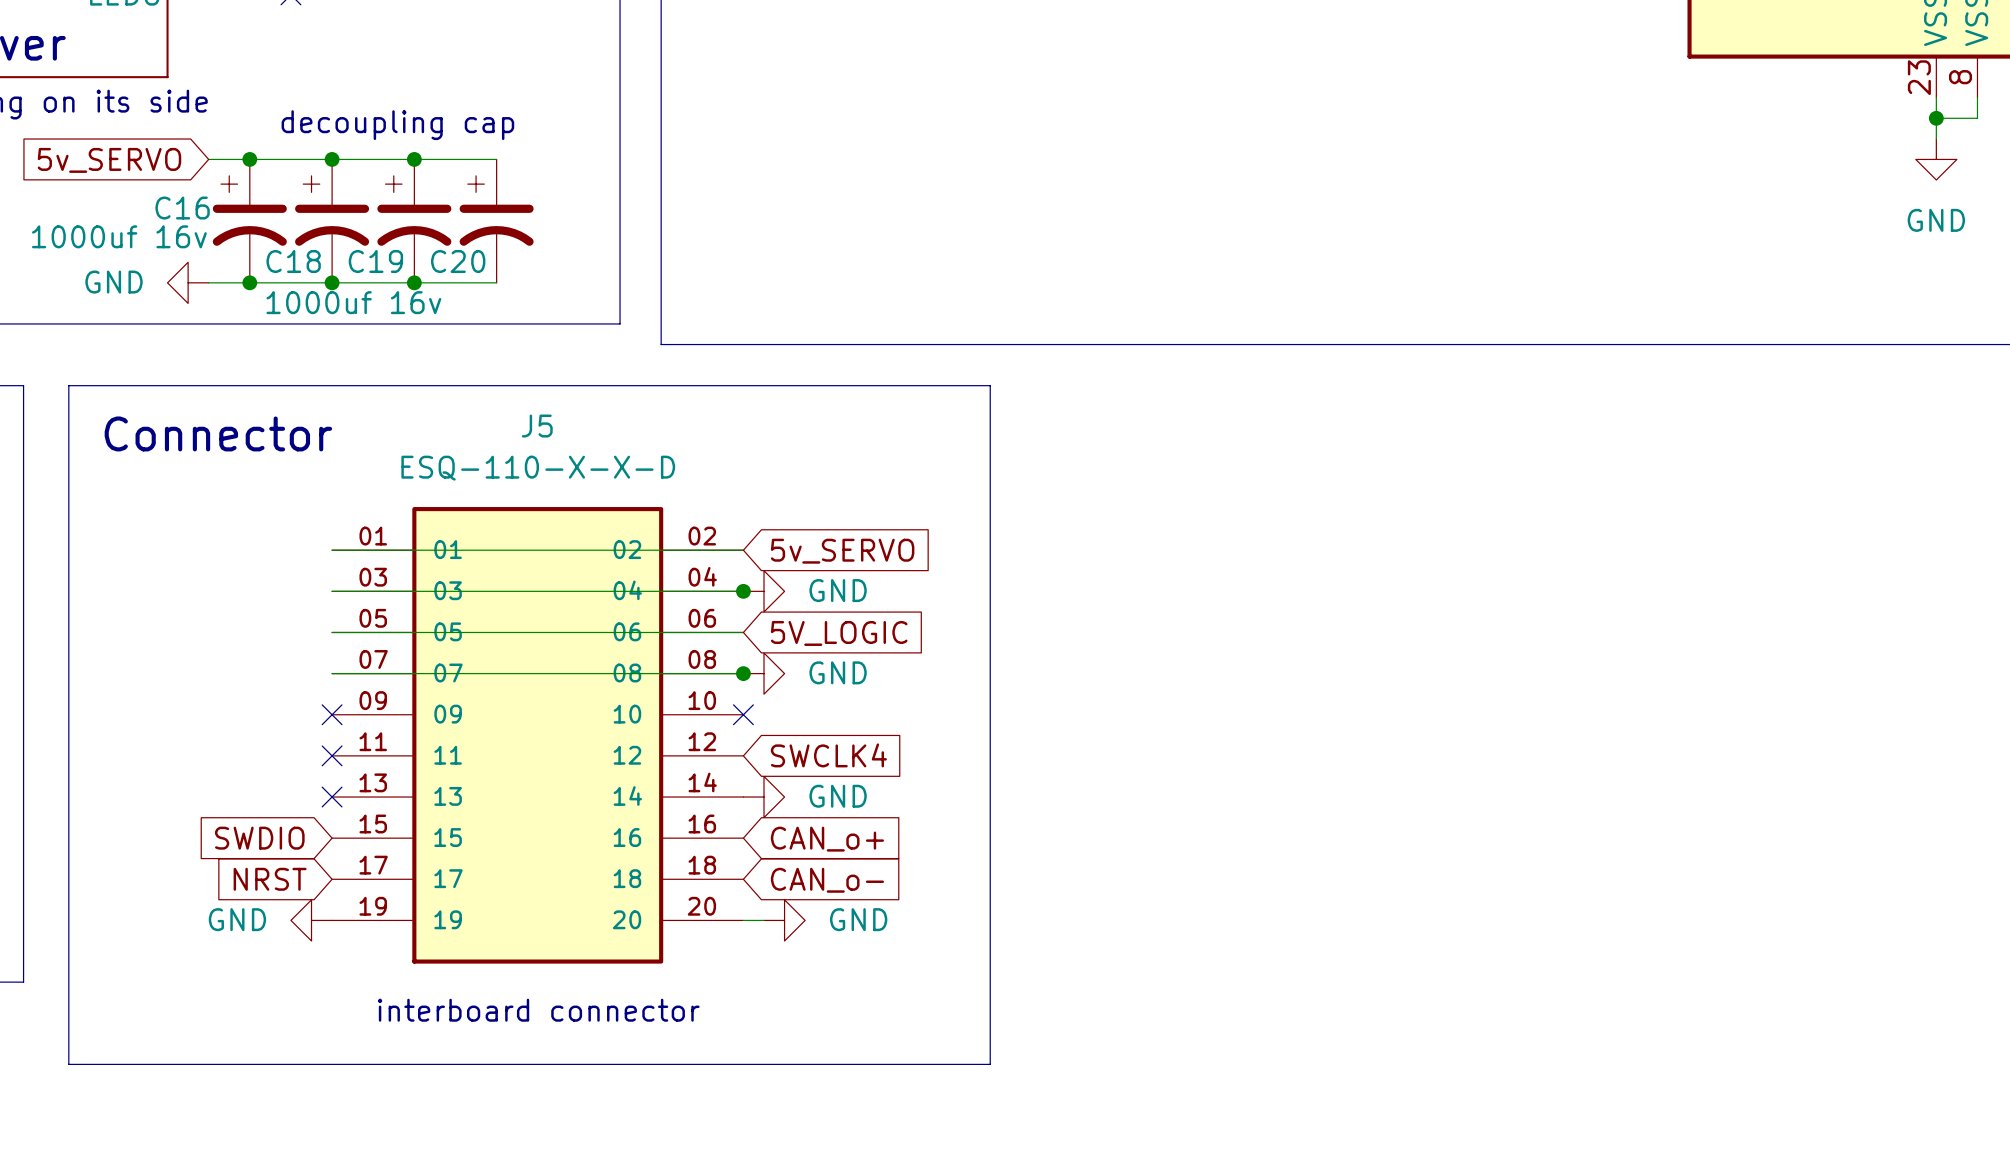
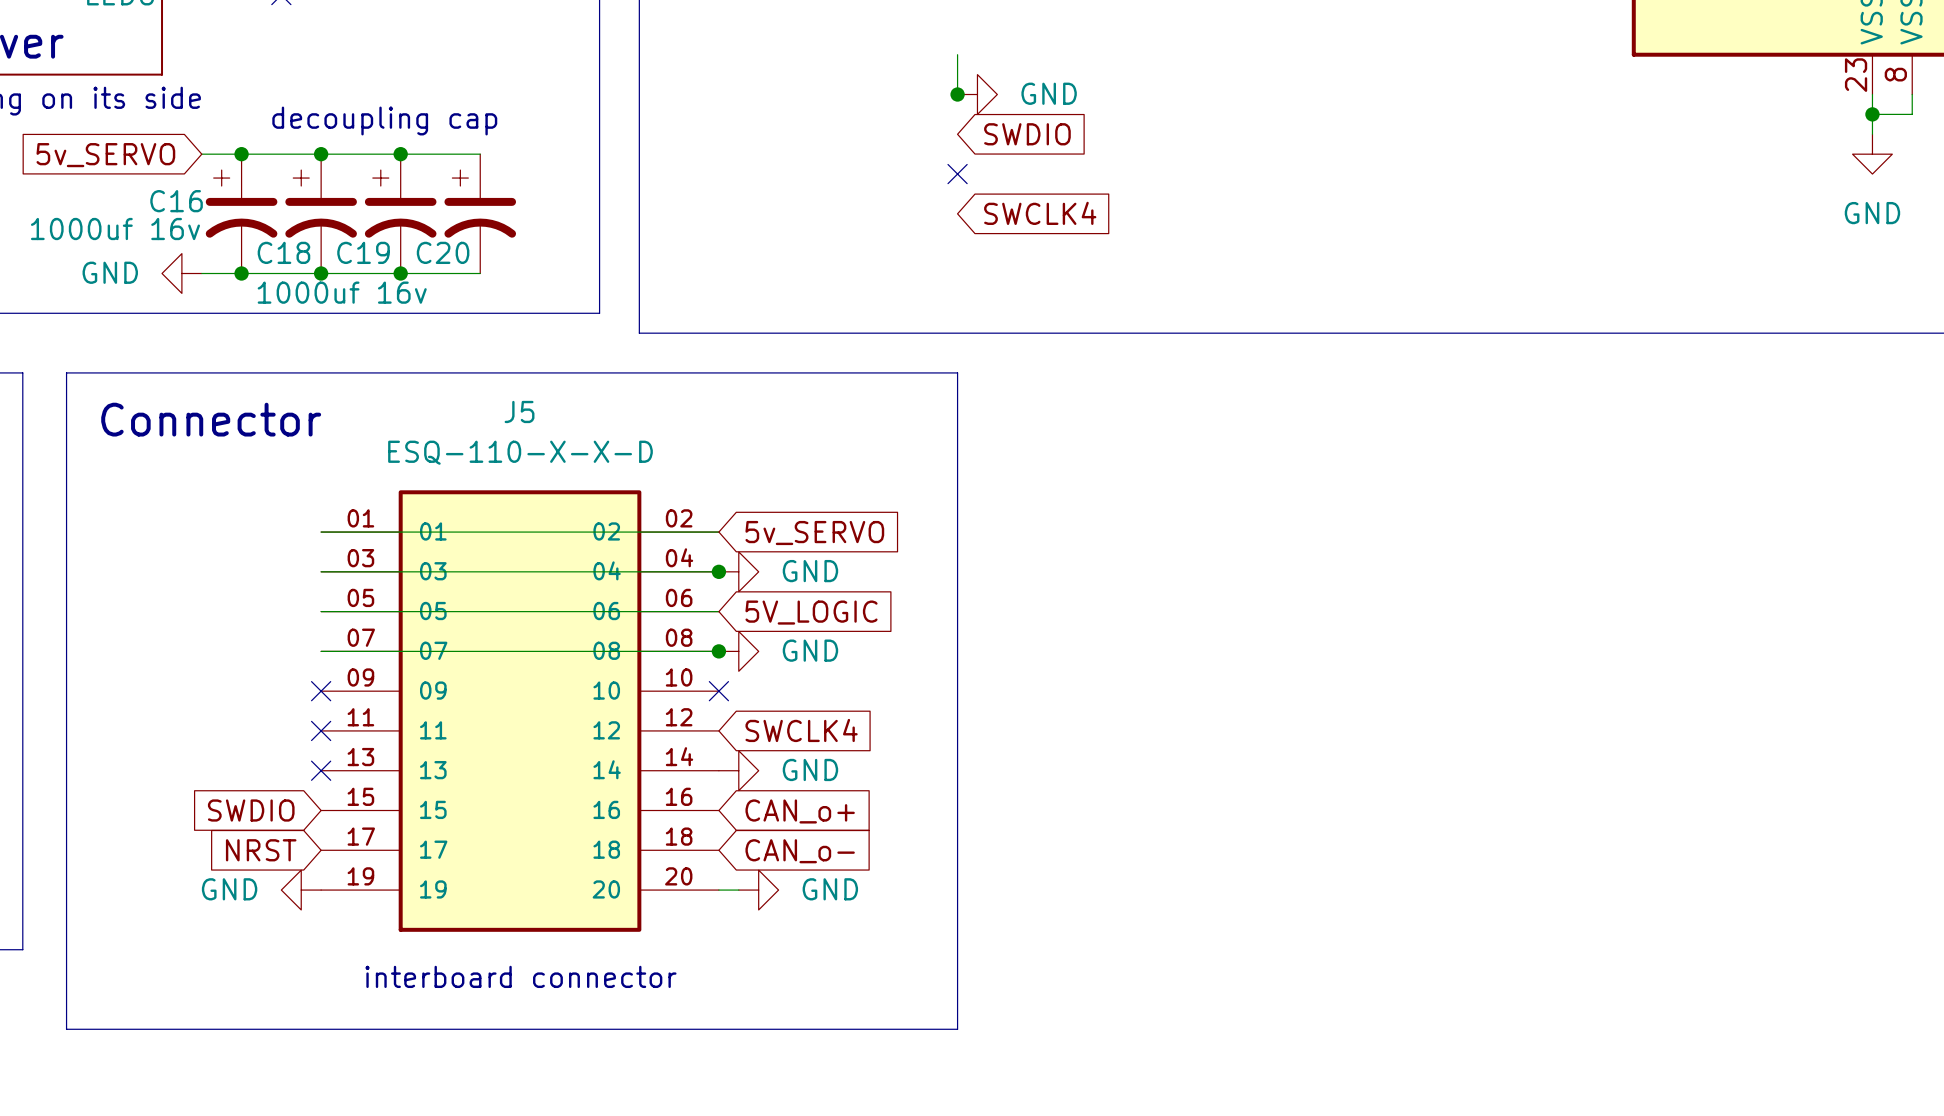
wire: none -> (957, 54) (957, 94)
junction: none -> (957, 94)
power symbol: none -> GND (977, 94)
global label: none -> SWDIO (1027, 134)
no-connect mark: none -> (957, 174)
global label: none -> SWCLK4 (1040, 213)

